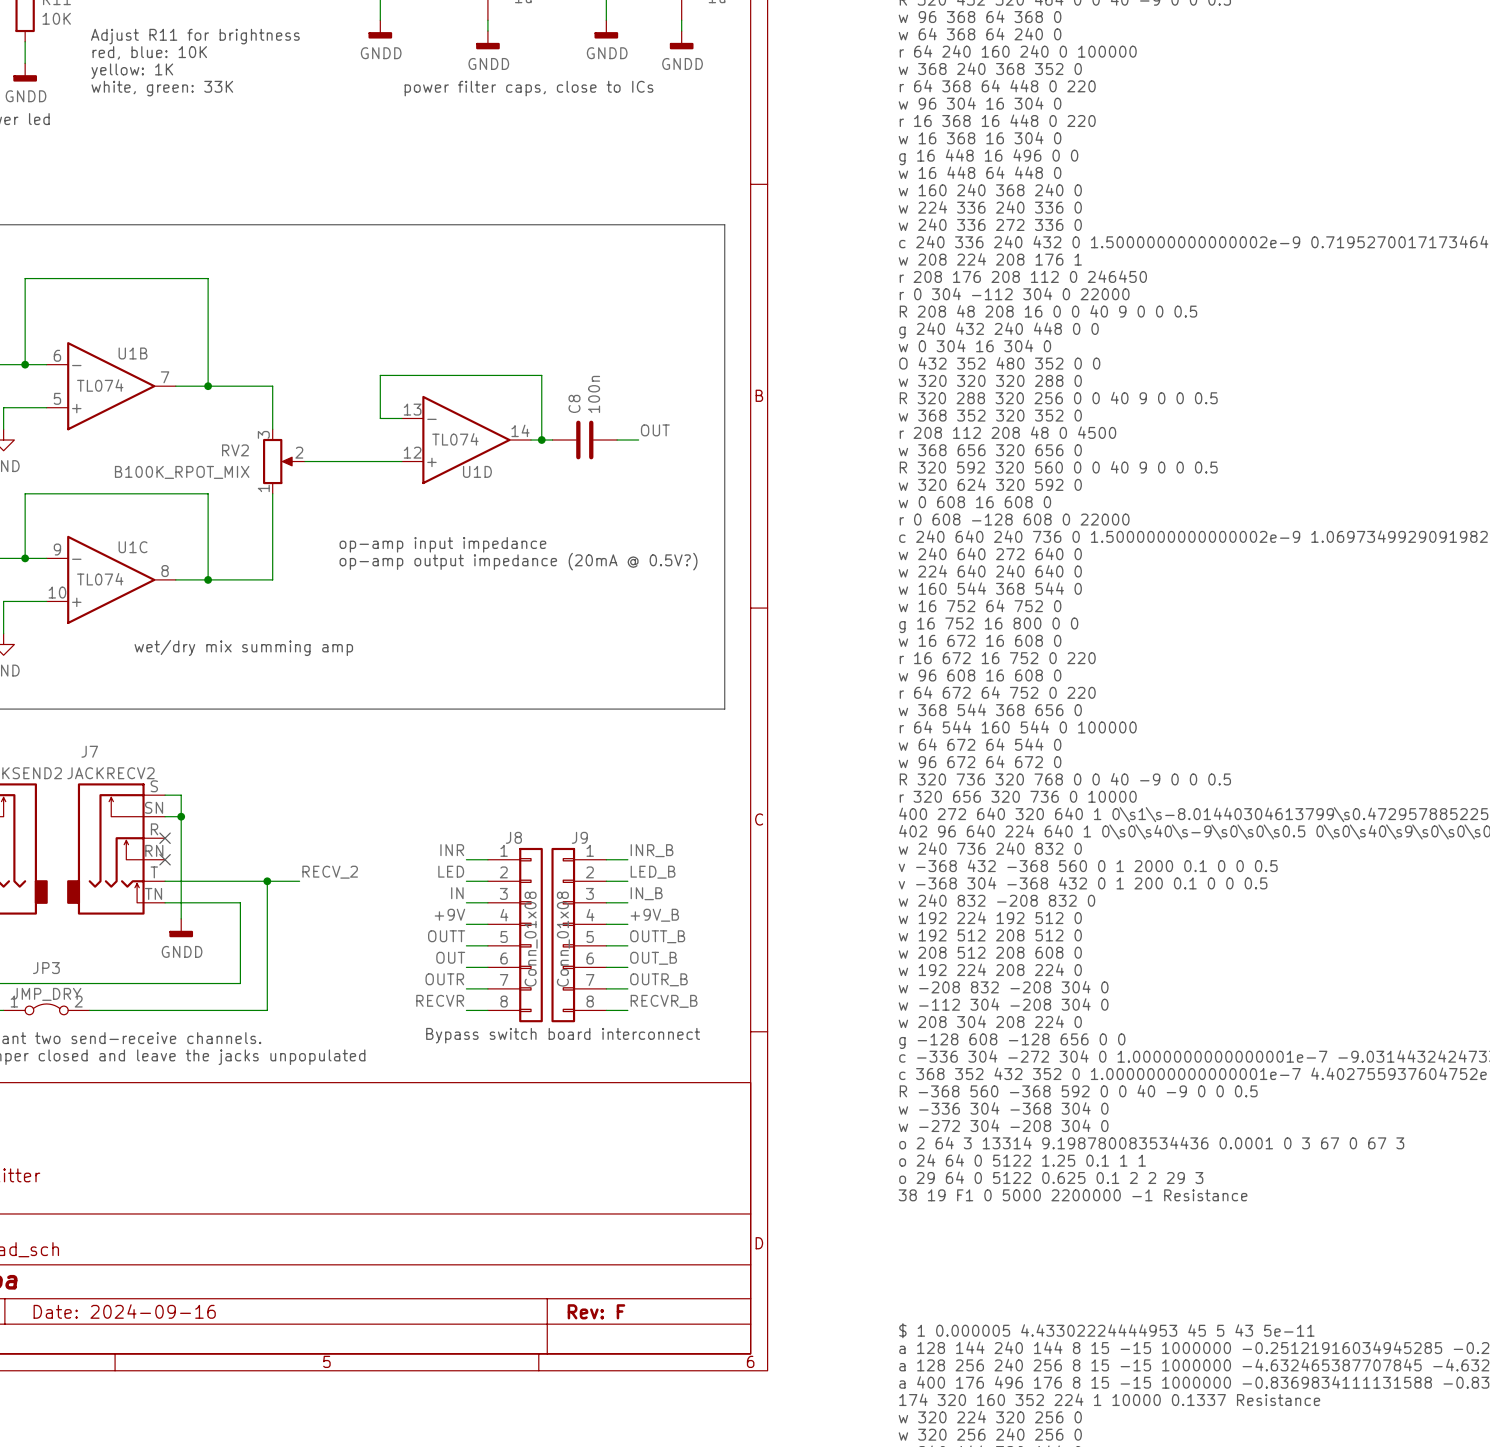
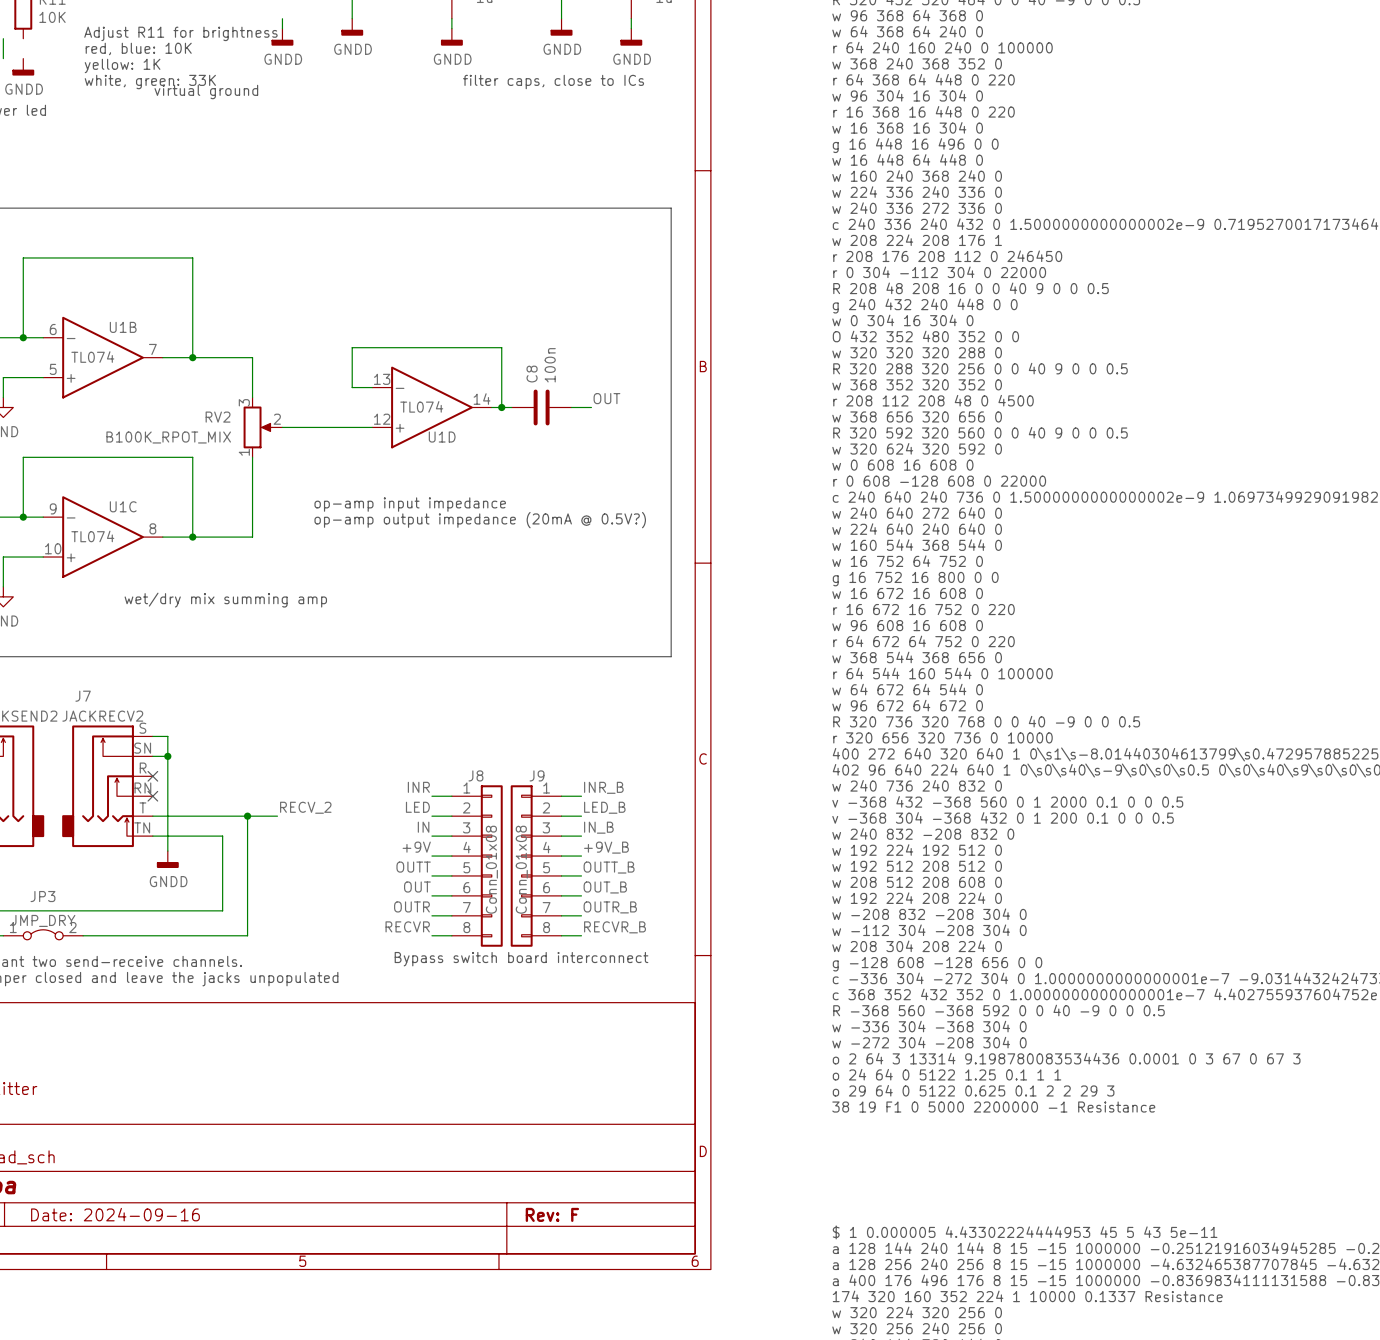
wire: none -> (282, 18) (282, 28)
power symbol: none -> GNDD (282, 37)
wire: (25, 41) (25, 63) -> (3, 38) (3, 58)
text: power filter caps, close to ICs (529, 88) -> filter caps, close to ICs (553, 82)
text: none -> virtual ground (206, 91)

